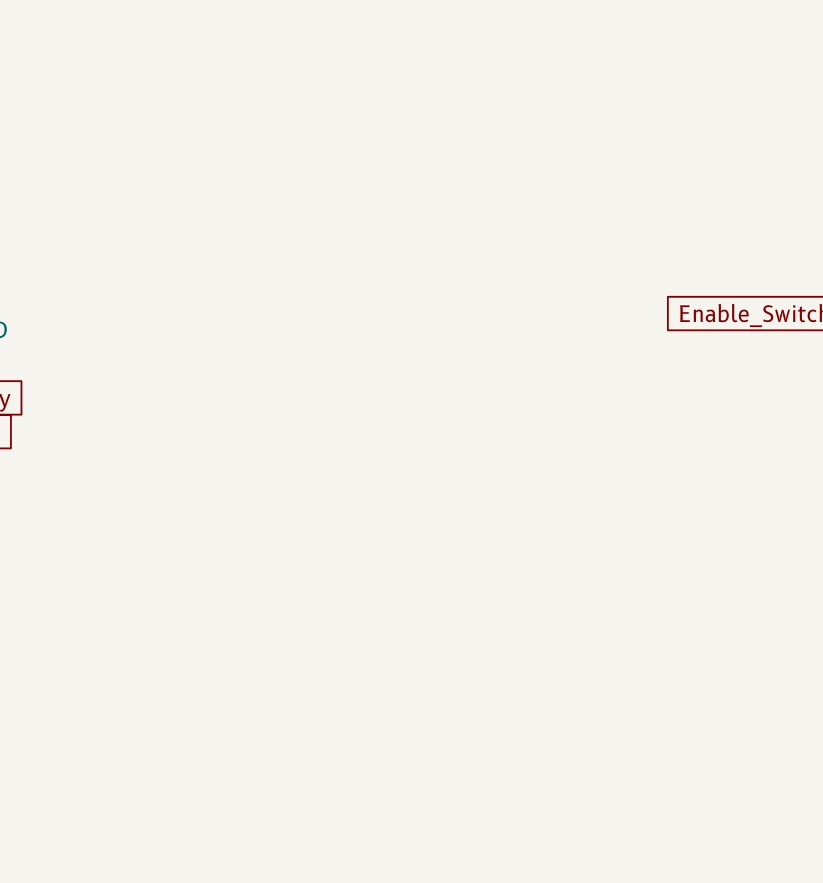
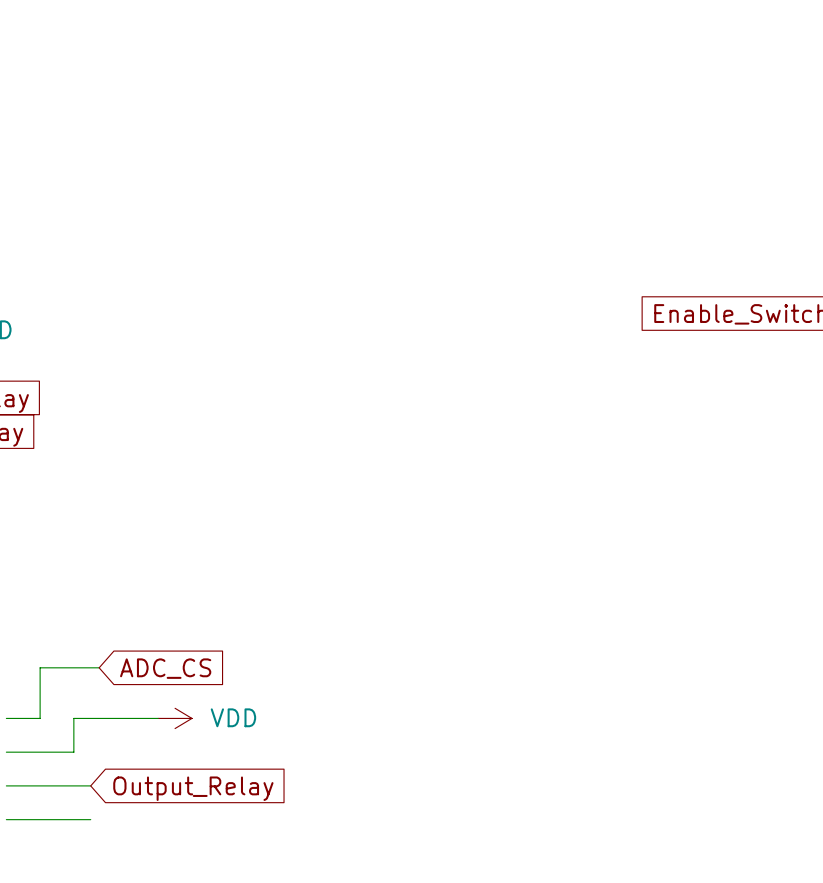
wire: none -> (99, 667) (40, 667) (40, 718) (6, 718)
global label: none -> ADC_CS (165, 668)
wire: none -> (158, 718) (73, 718) (73, 752) (6, 752)
power symbol: none -> VDD (175, 718)
wire: none -> (6, 785) (90, 785)
global label: none -> Output_Relay (193, 788)
wire: none -> (6, 819) (90, 819)

